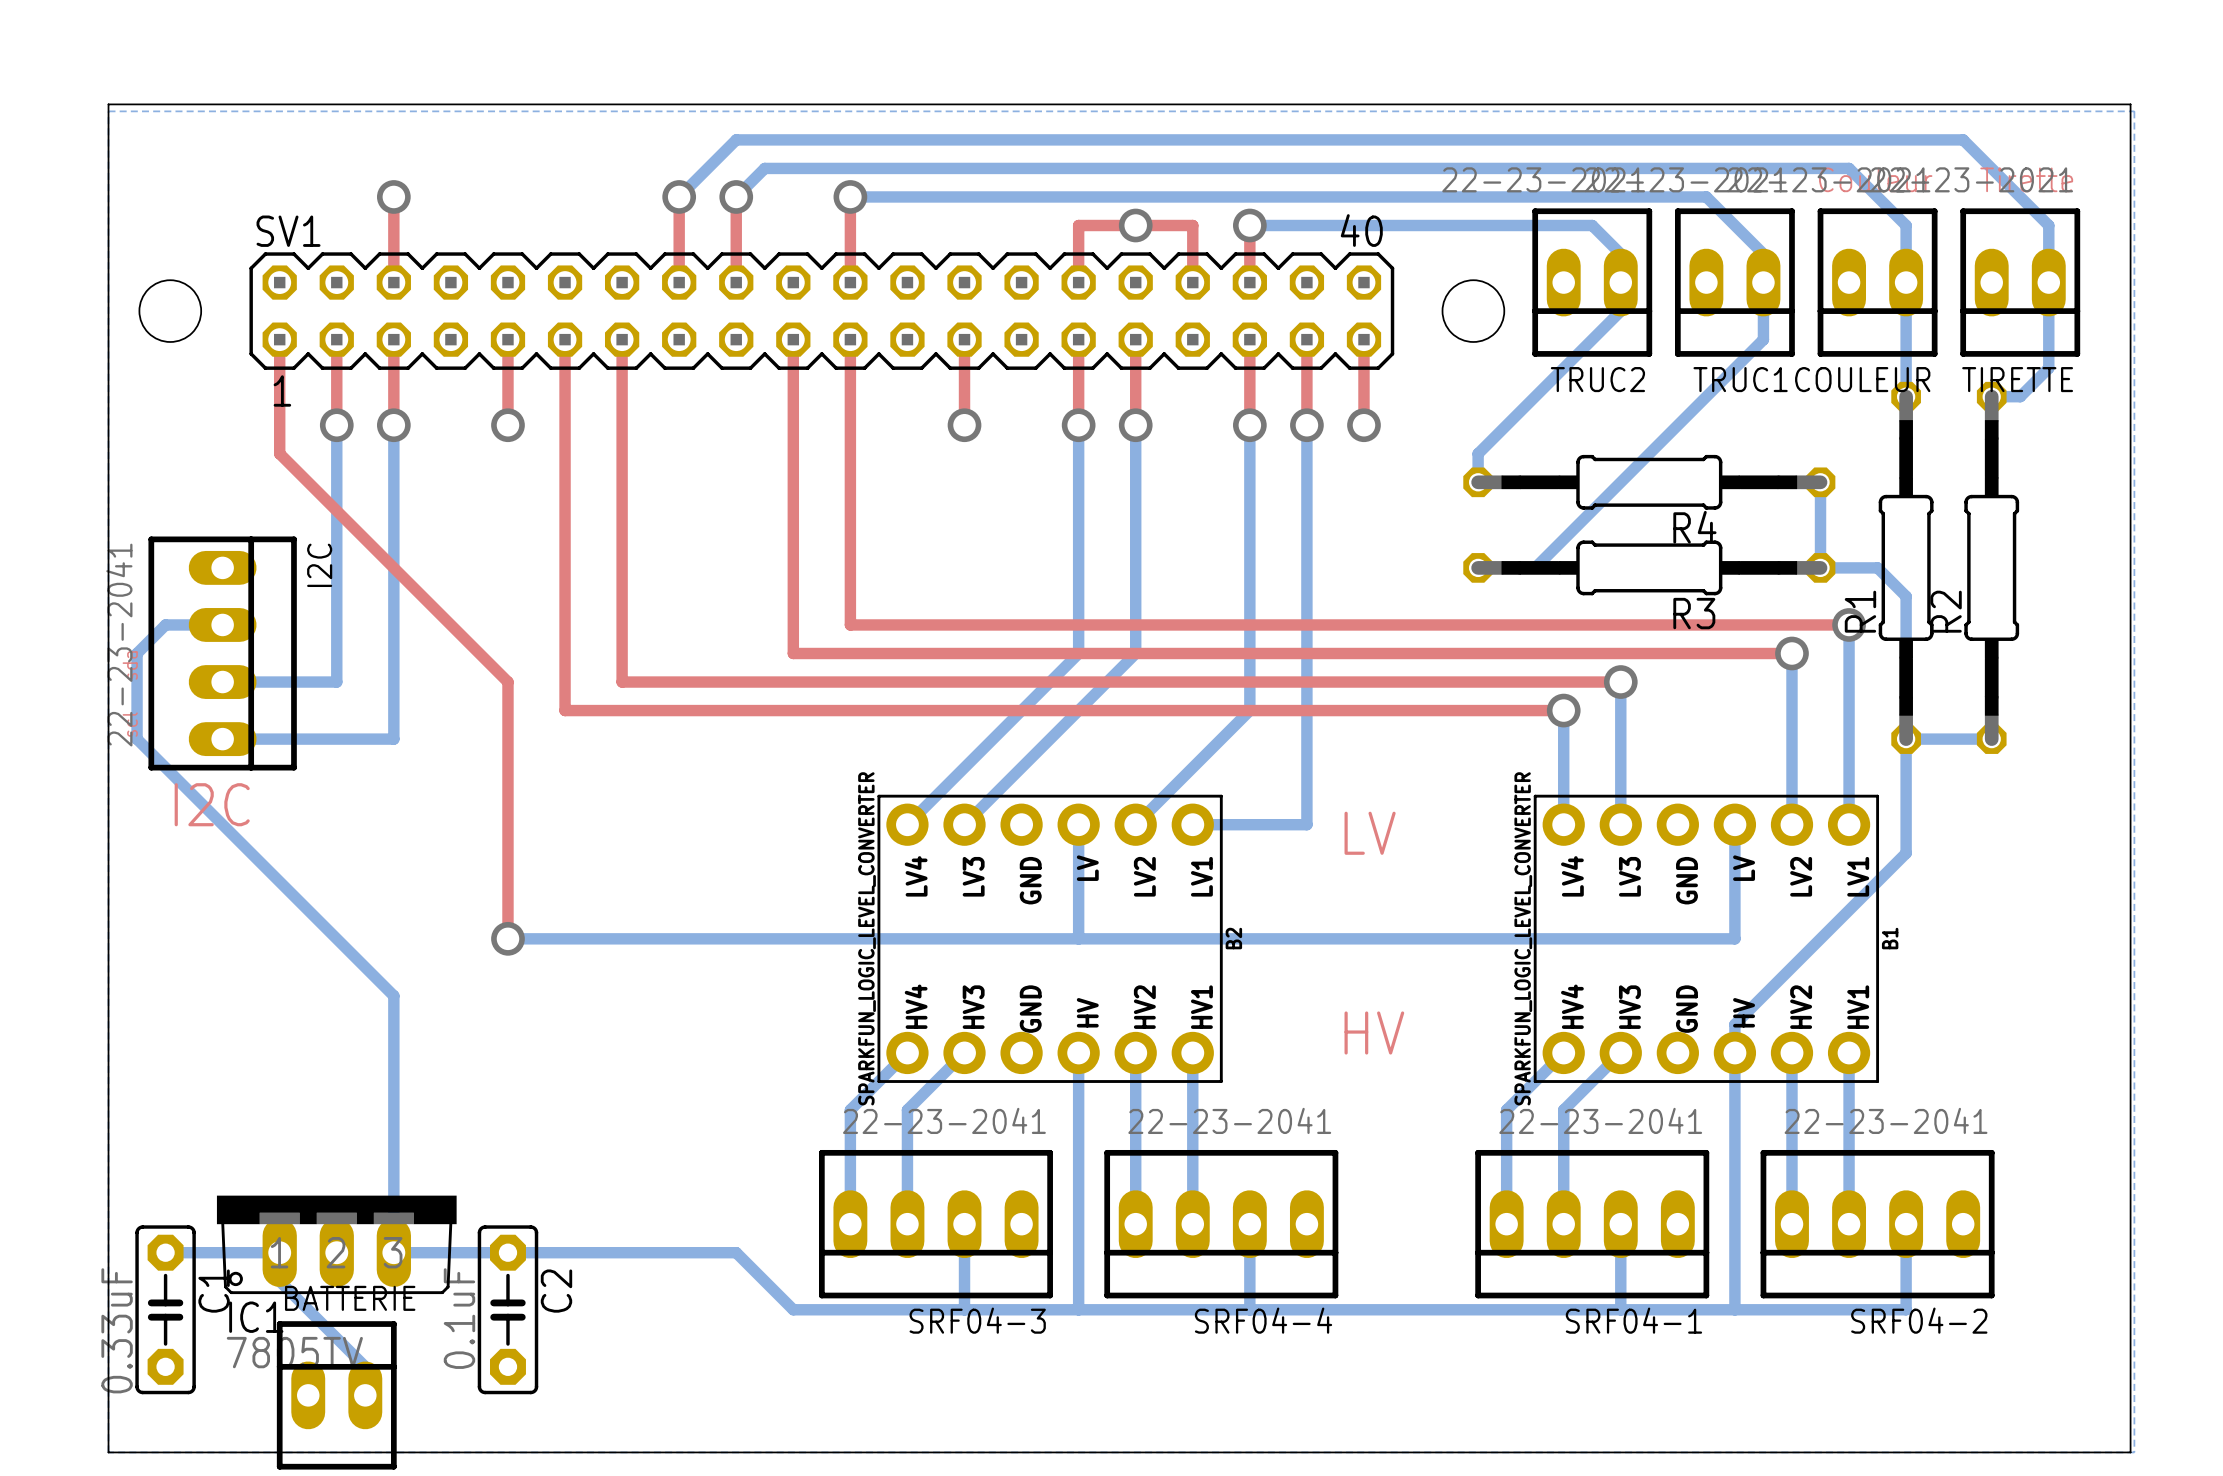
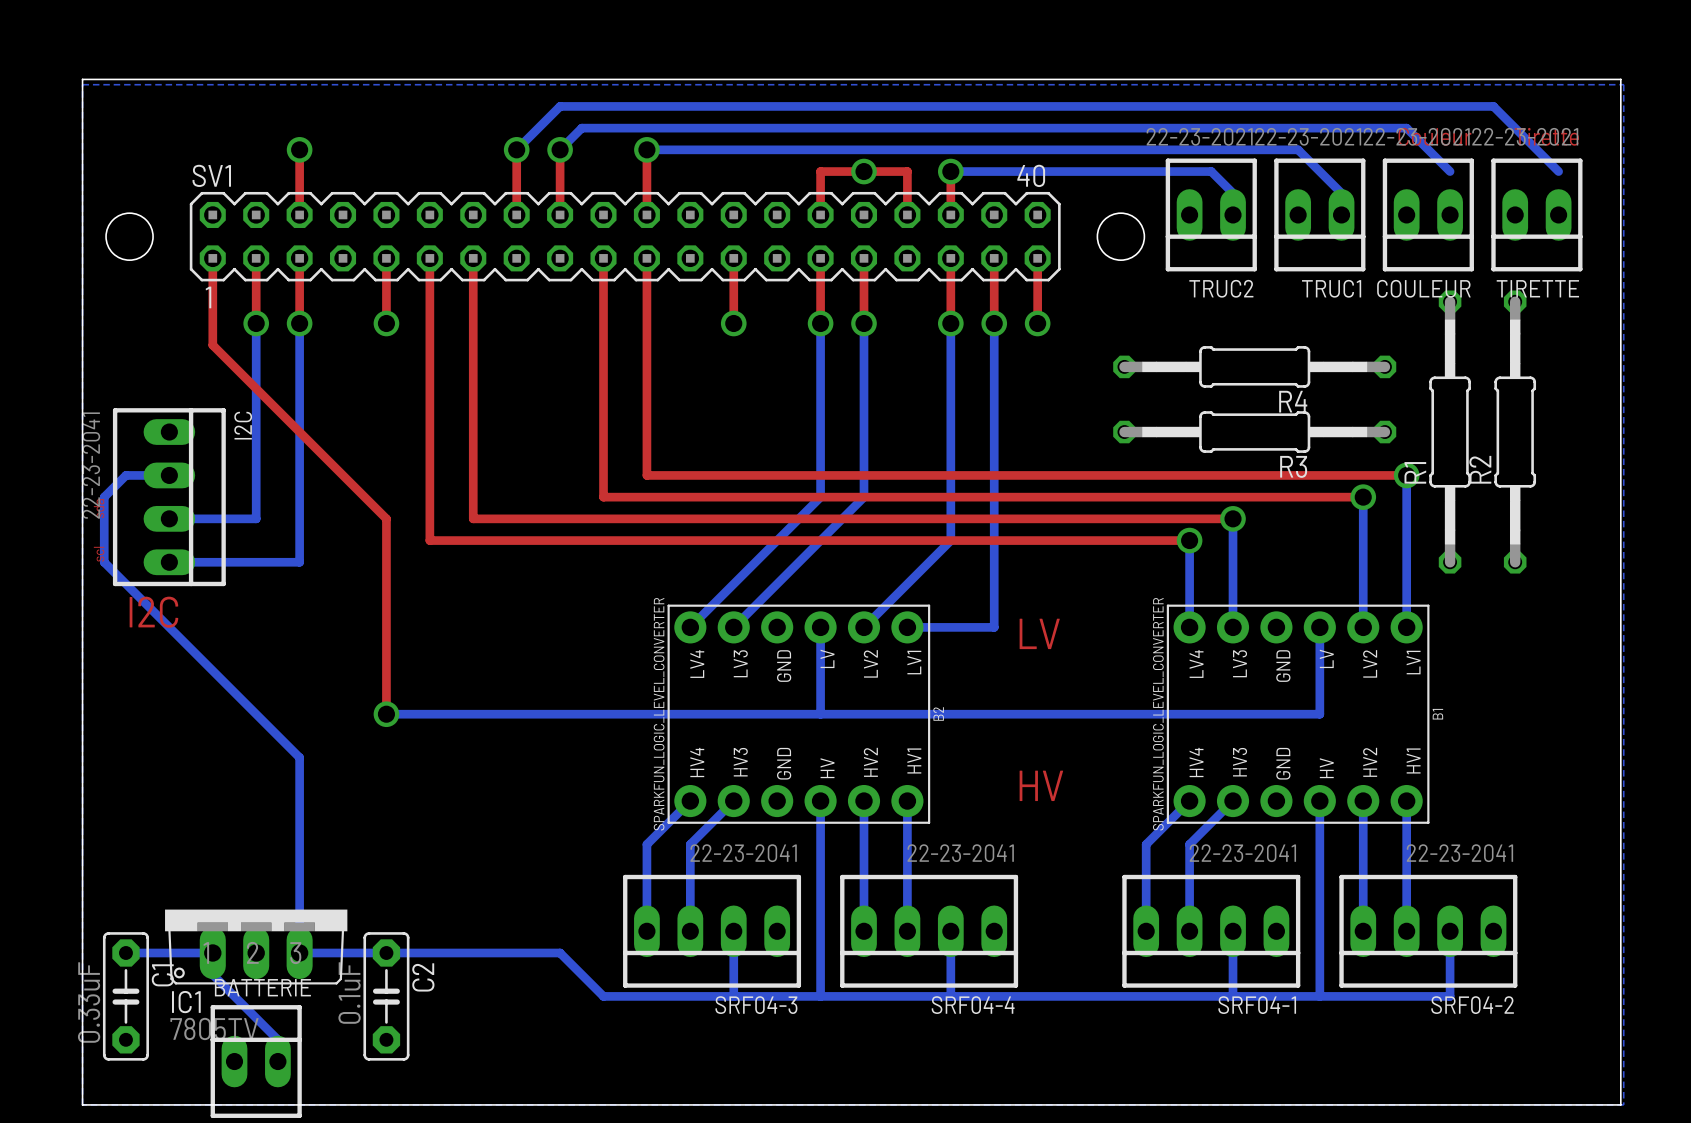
bottom track: (1906, 225) (1906, 396) -> none
bottom track: (2048, 225) (2048, 368) (2020, 396) (1991, 396) -> none
bottom track: (1620, 254) (1620, 311) (1478, 453) (1478, 482) -> none
bottom track: (1763, 282) (1763, 339) (1535, 567) (1478, 567) -> none
bottom track: (1820, 482) (1820, 567) (1877, 567) (1906, 596) (1906, 853) (1734, 1024) (1734, 1052) -> none
bottom track: (1906, 739) (1991, 739) -> none

